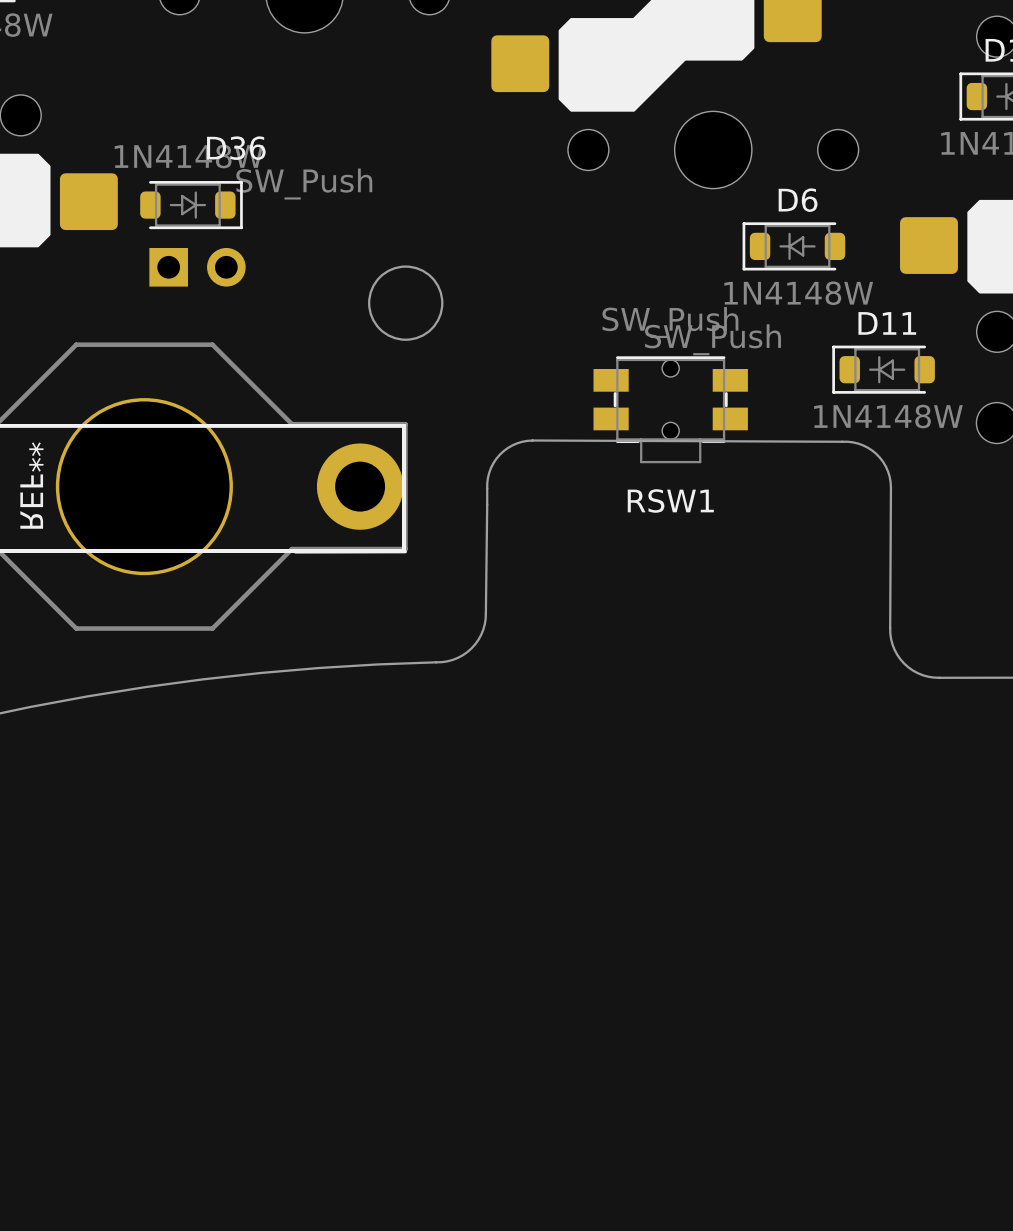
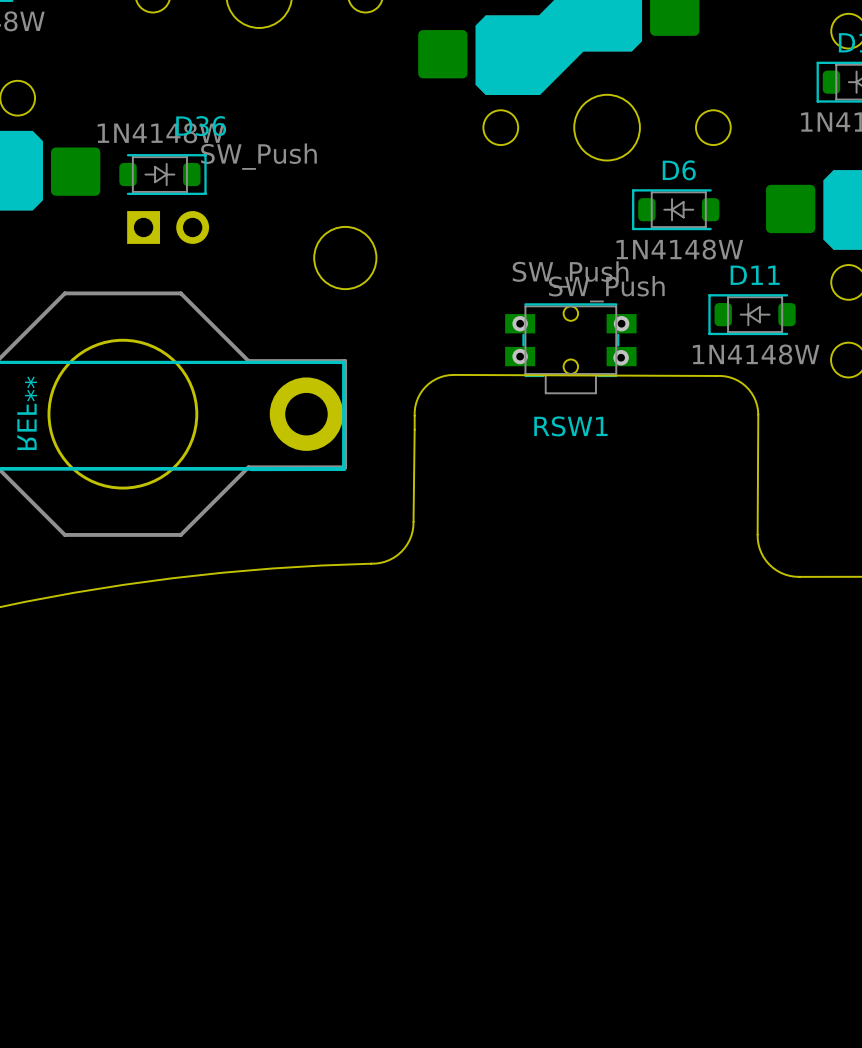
via: none -> (520, 323)
via: none -> (621, 323)
via: none -> (520, 356)
via: none -> (621, 357)

